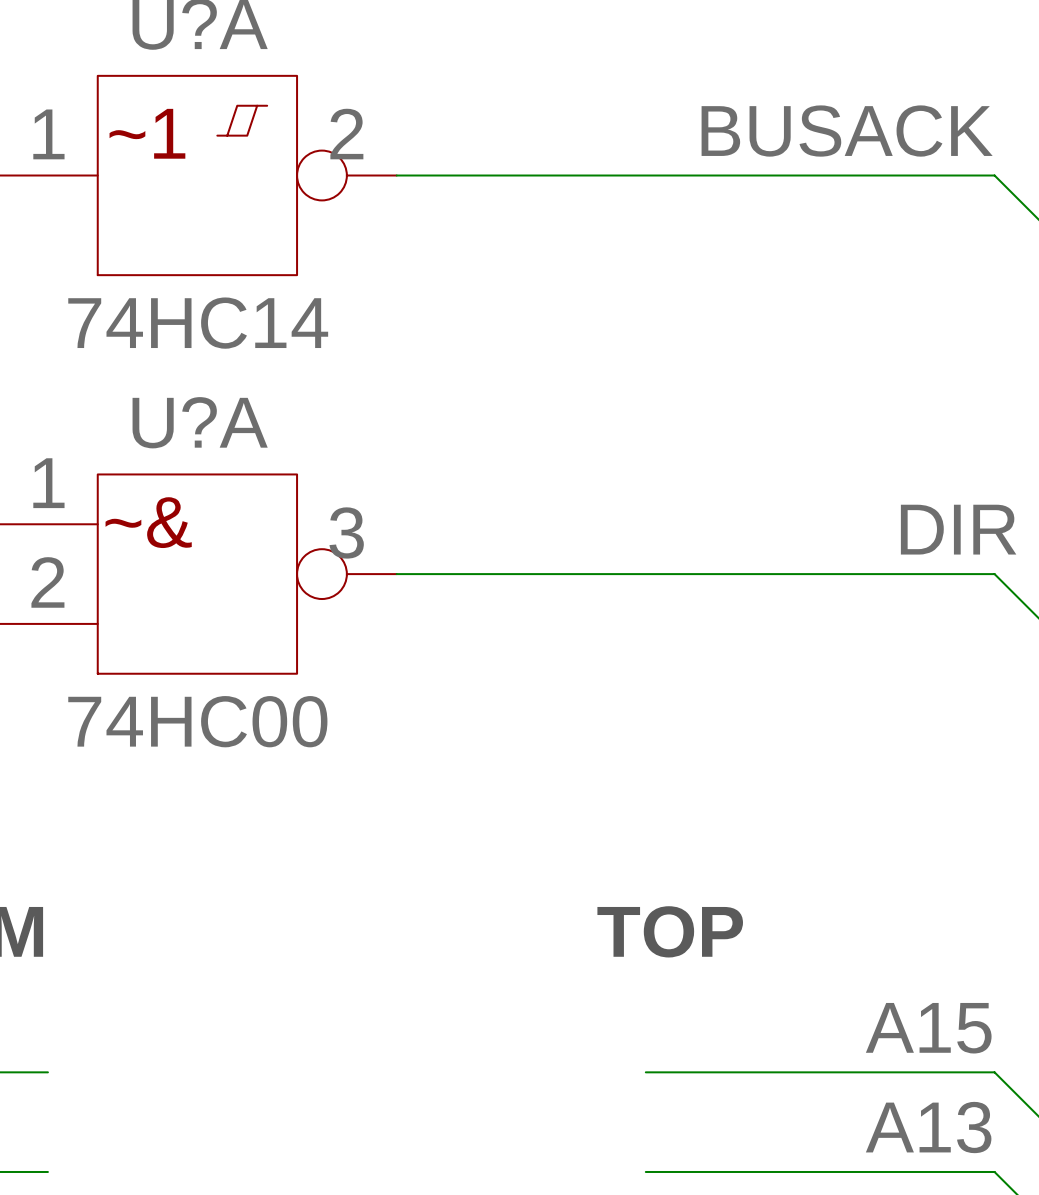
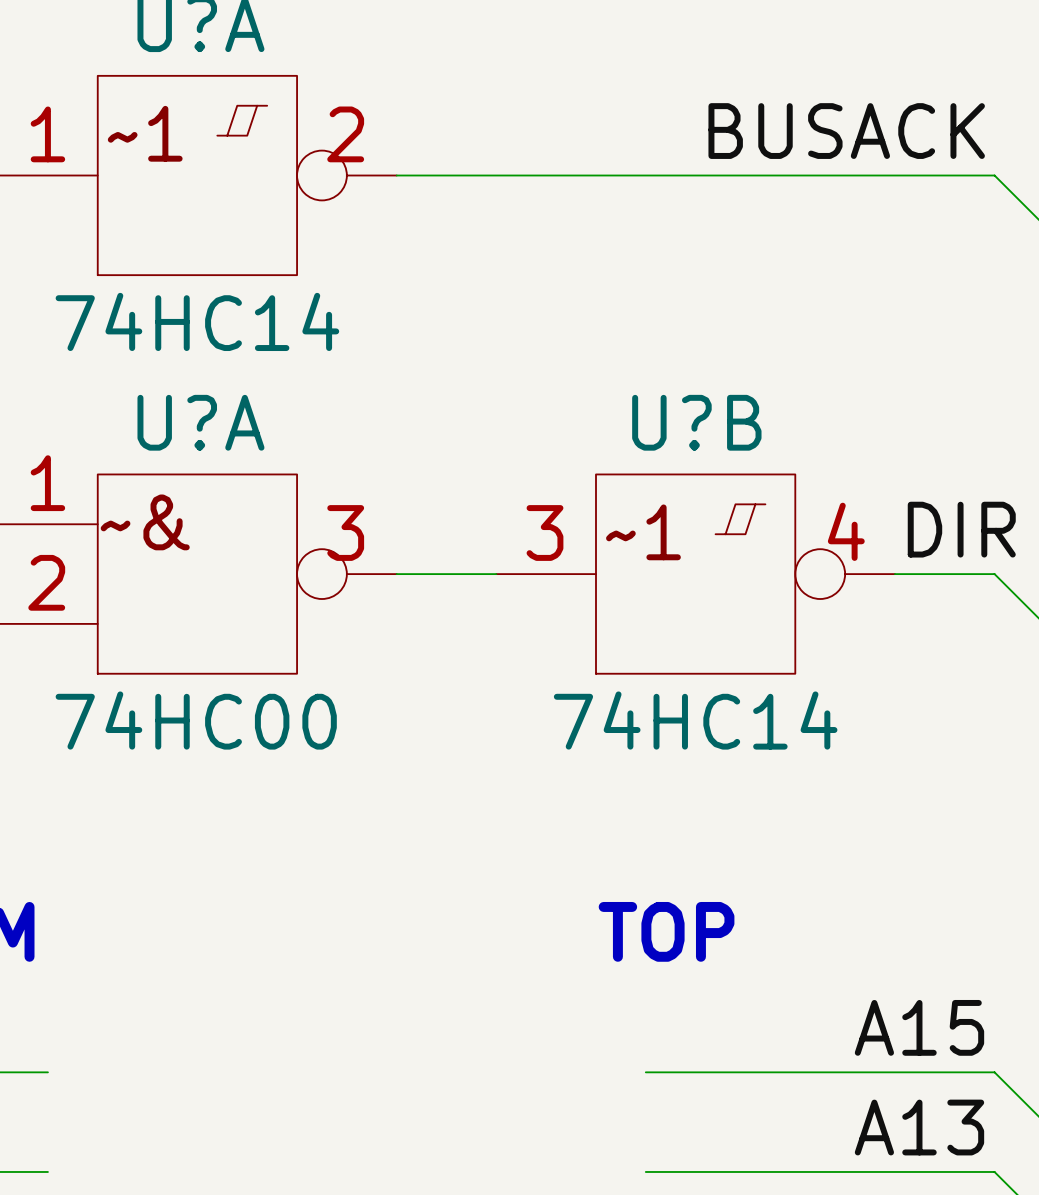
wire: (496, 574) (894, 574) -> none
U?B: none -> 74HC14 (695, 574)

